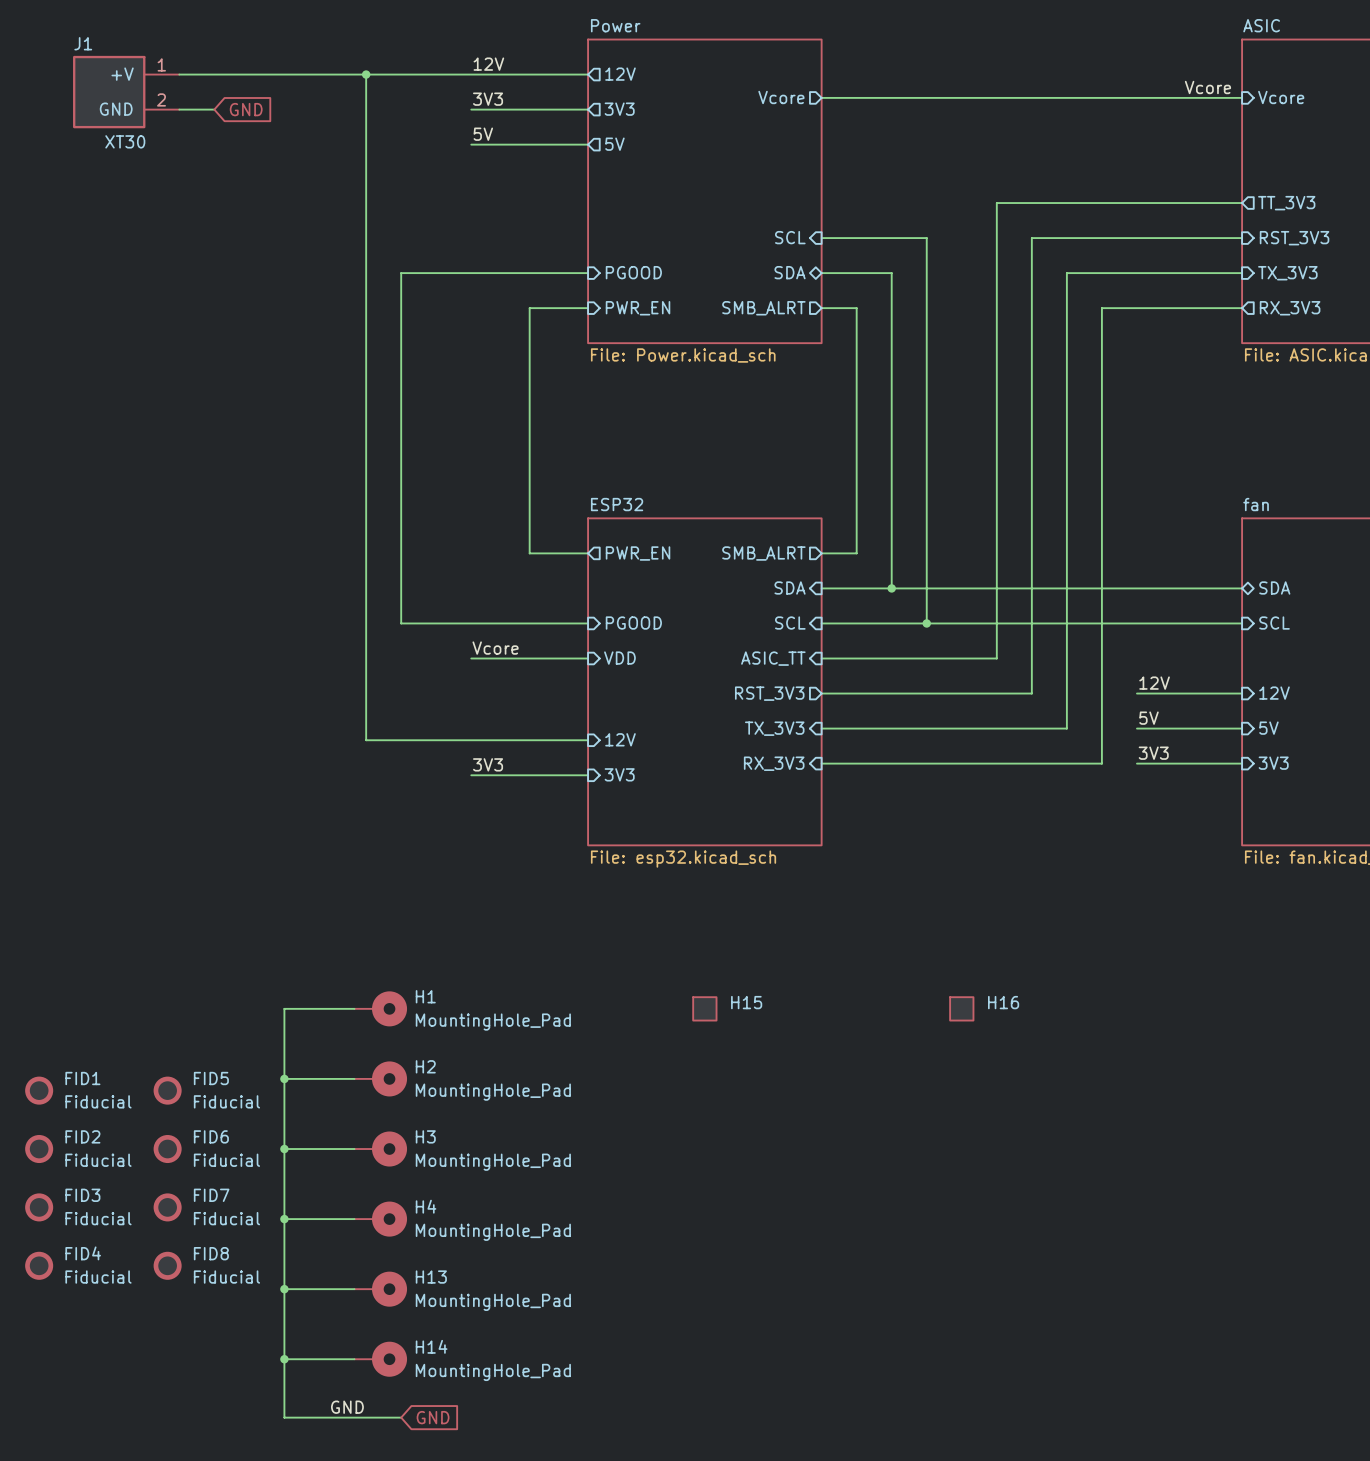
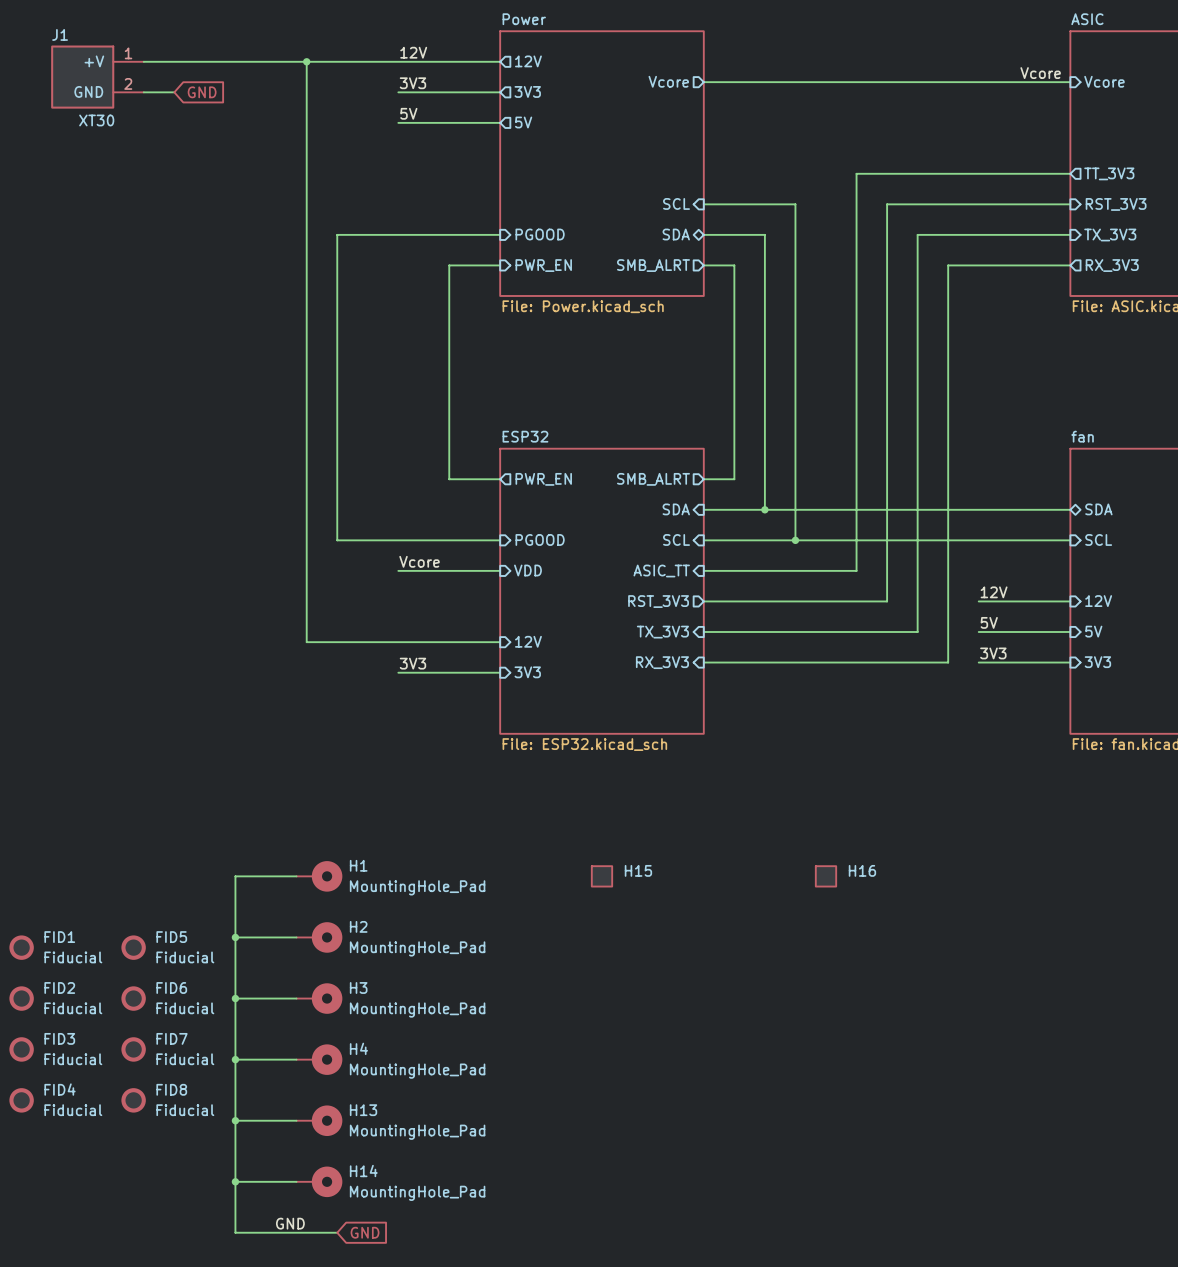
sheet ESP32 value: File: esp32.kicad_sch (683, 859) -> File: ESP32.kicad_sch (584, 744)

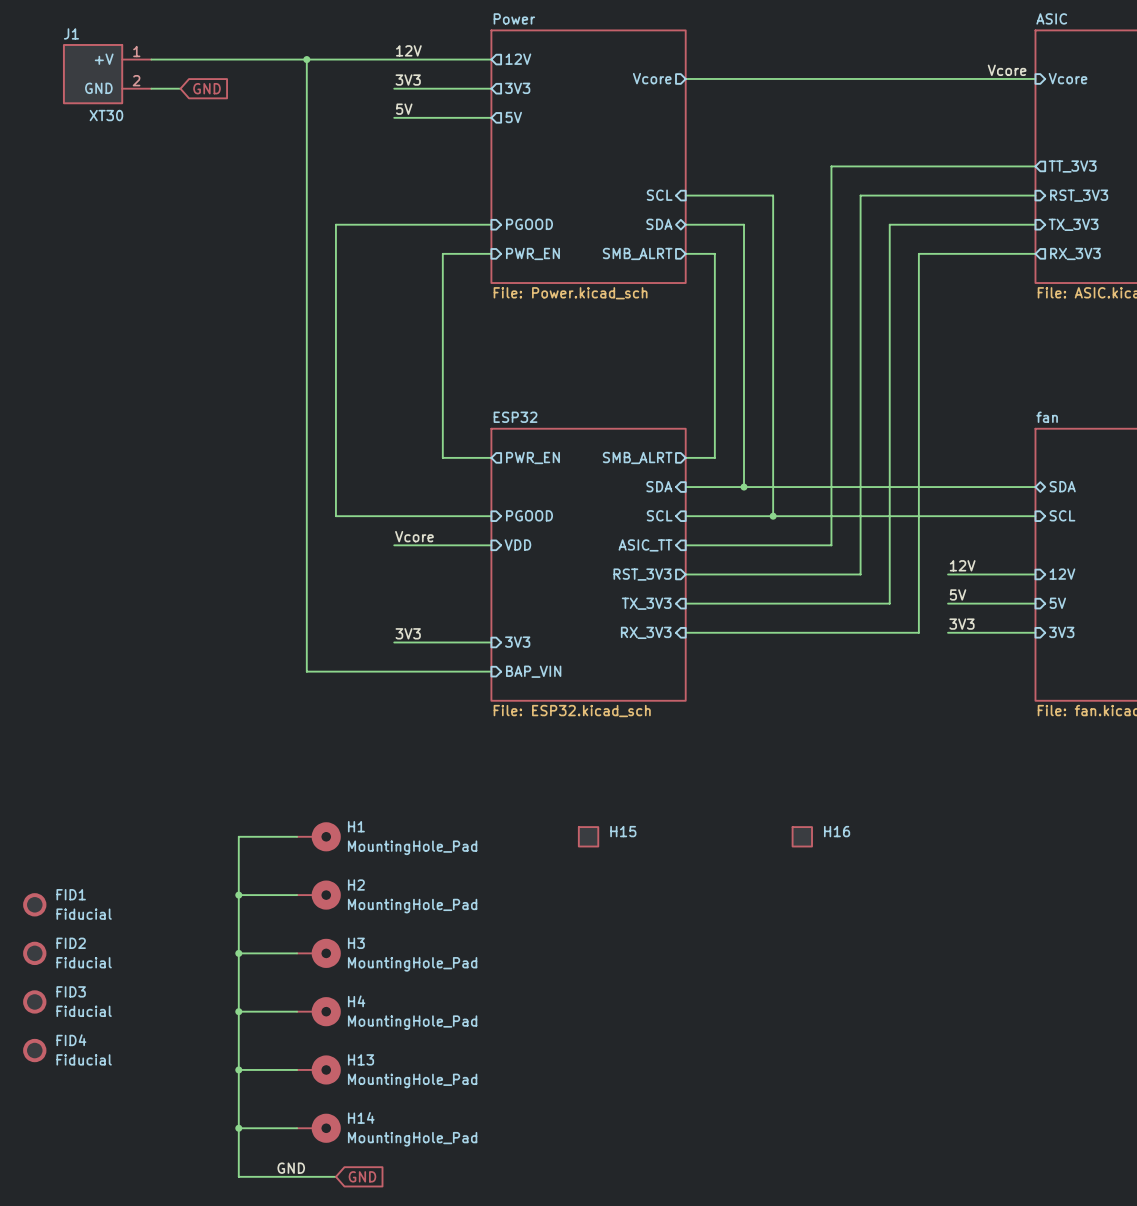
sheet pin: 12V (528, 641) -> none
wire: (306, 642) (500, 642) -> (306, 613) (306, 671) (491, 671)
sheet pin: none -> BAP_VIN (533, 671)
FID5: Fiducial (133, 947) -> none
FID6: Fiducial (133, 998) -> none
FID7: Fiducial (133, 1049) -> none
FID8: Fiducial (133, 1100) -> none

